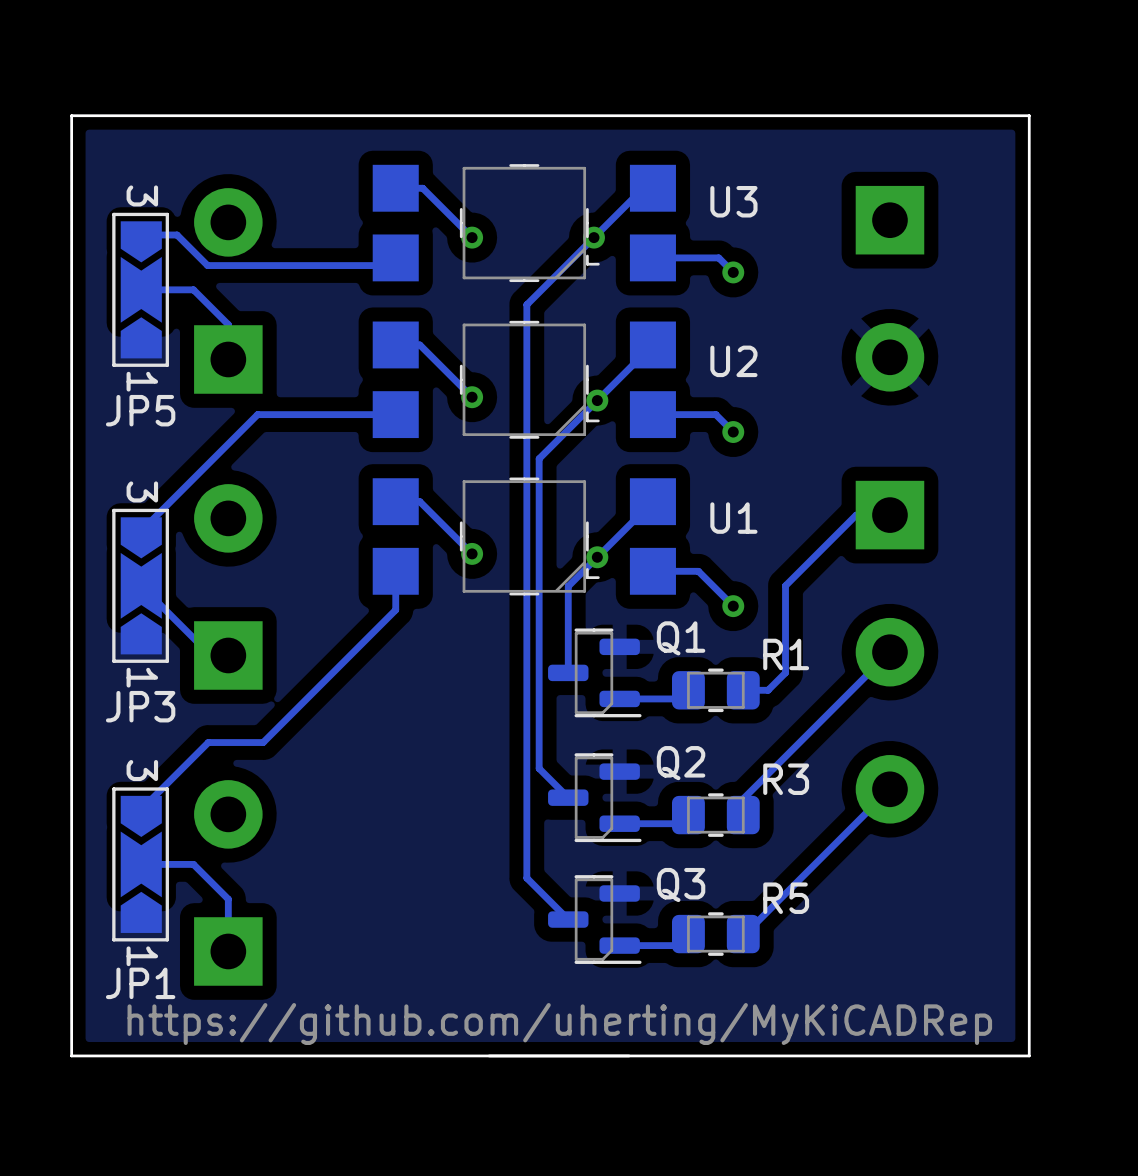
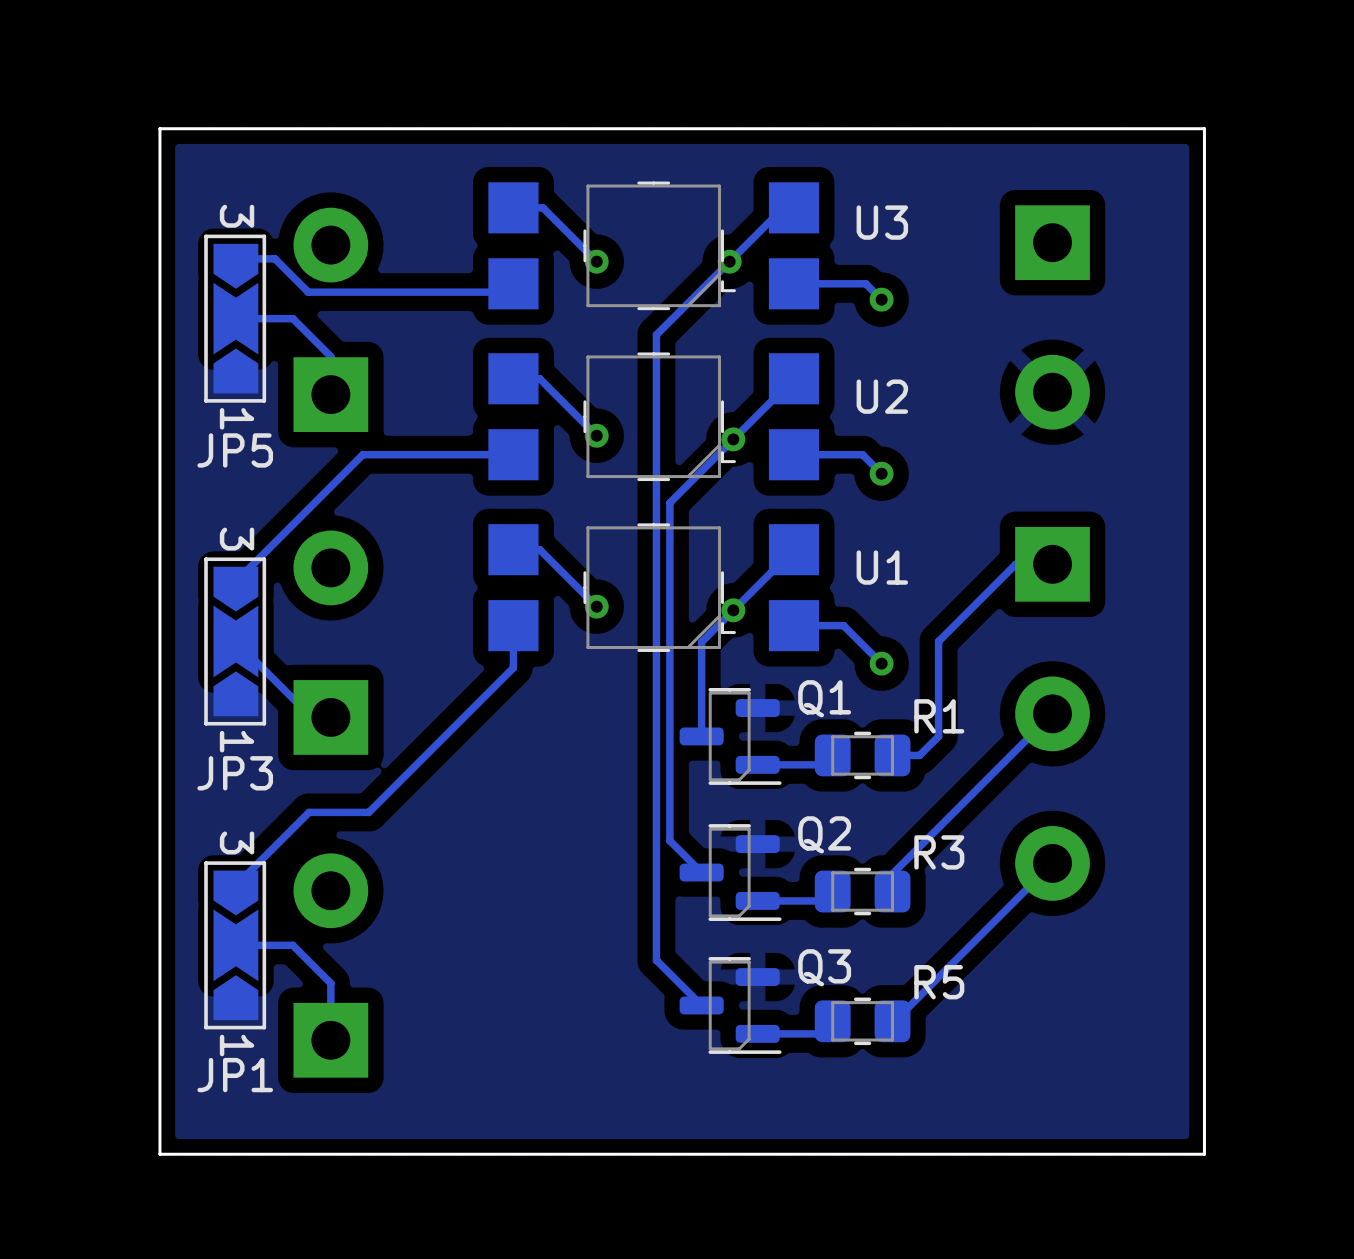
drawing: [487, 1054, 631, 1058] -> none

